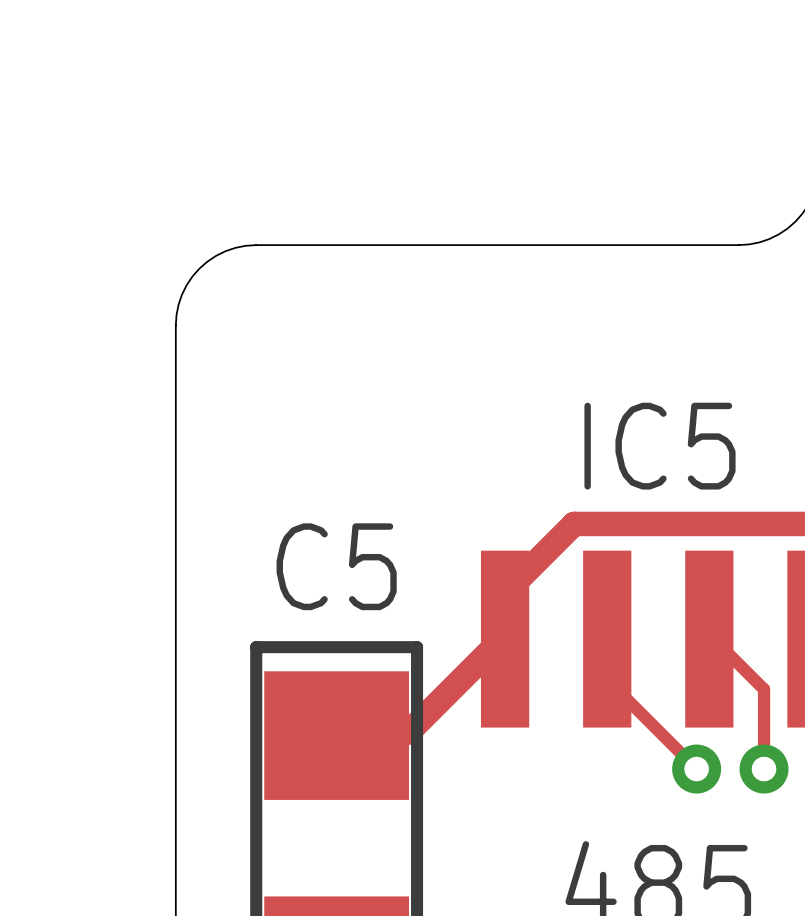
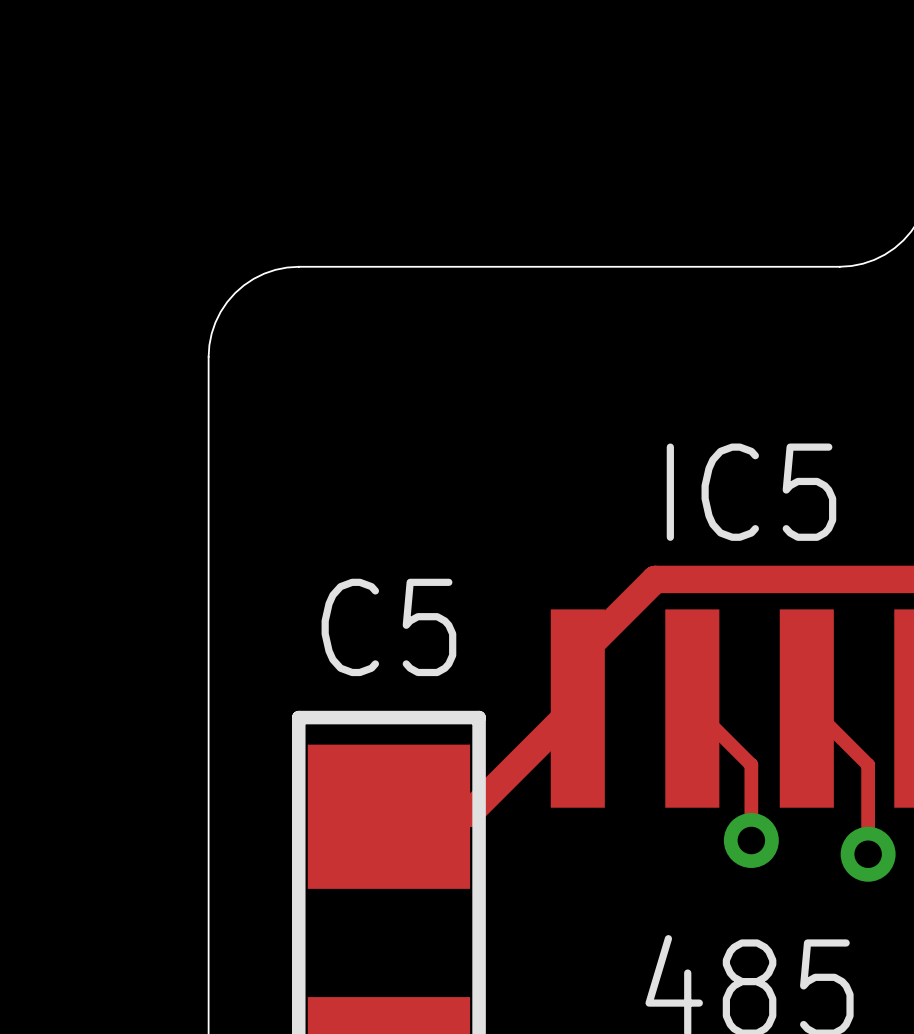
track: (610, 640) (610, 683) (696, 769) -> (696, 709) (751, 764) (751, 840)
via position: (696, 769) -> (751, 840)

